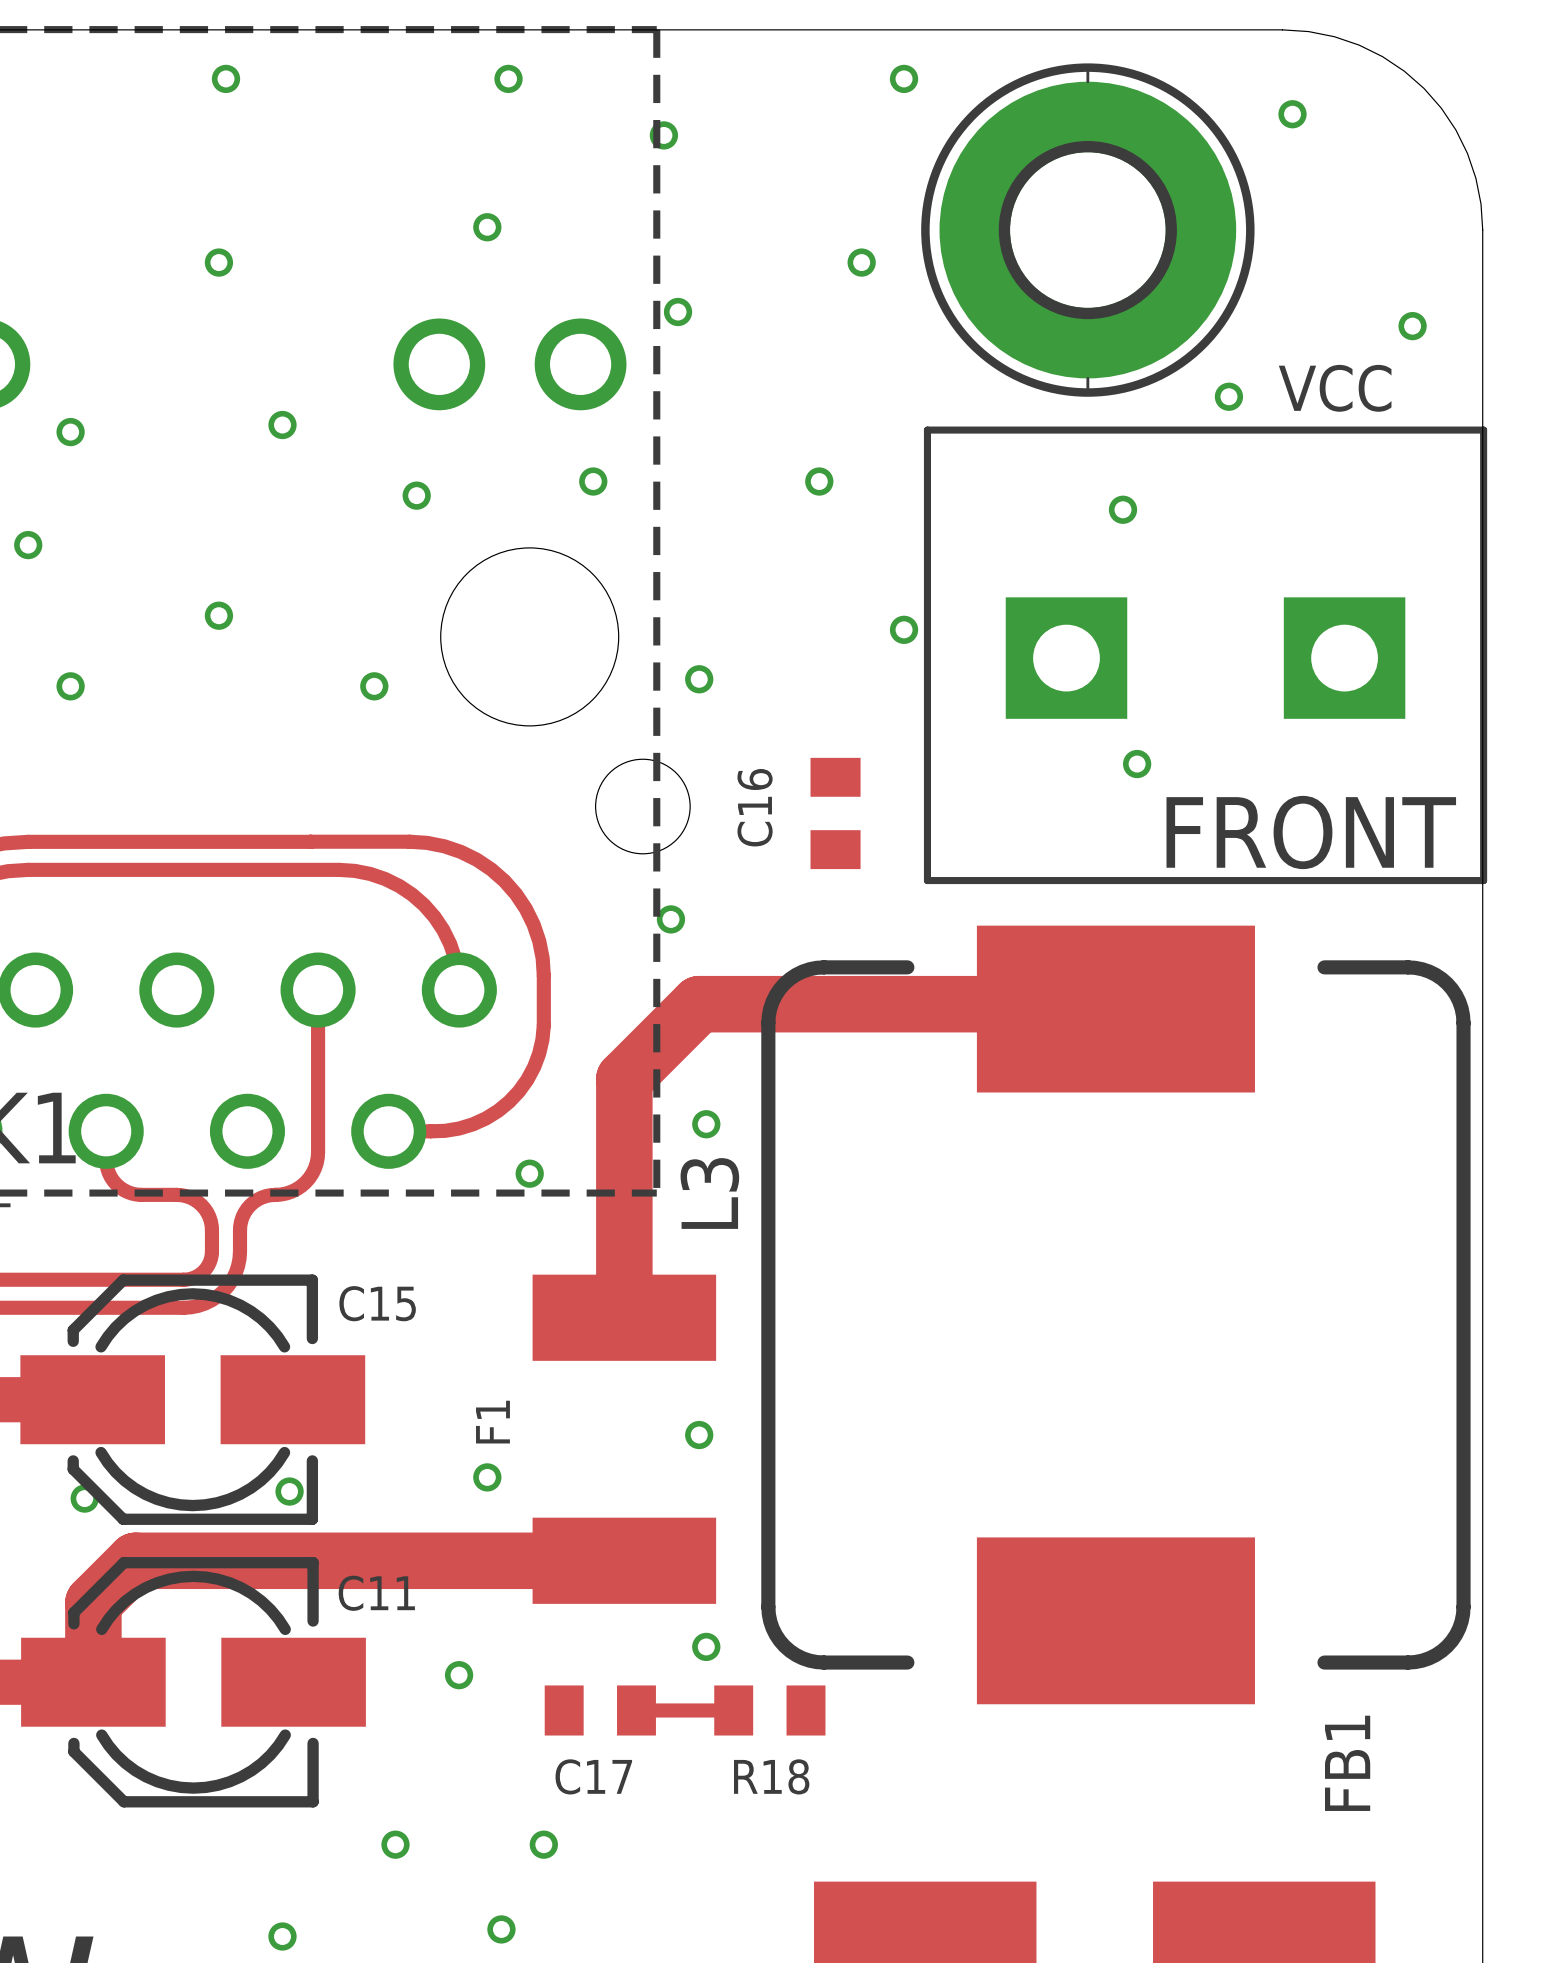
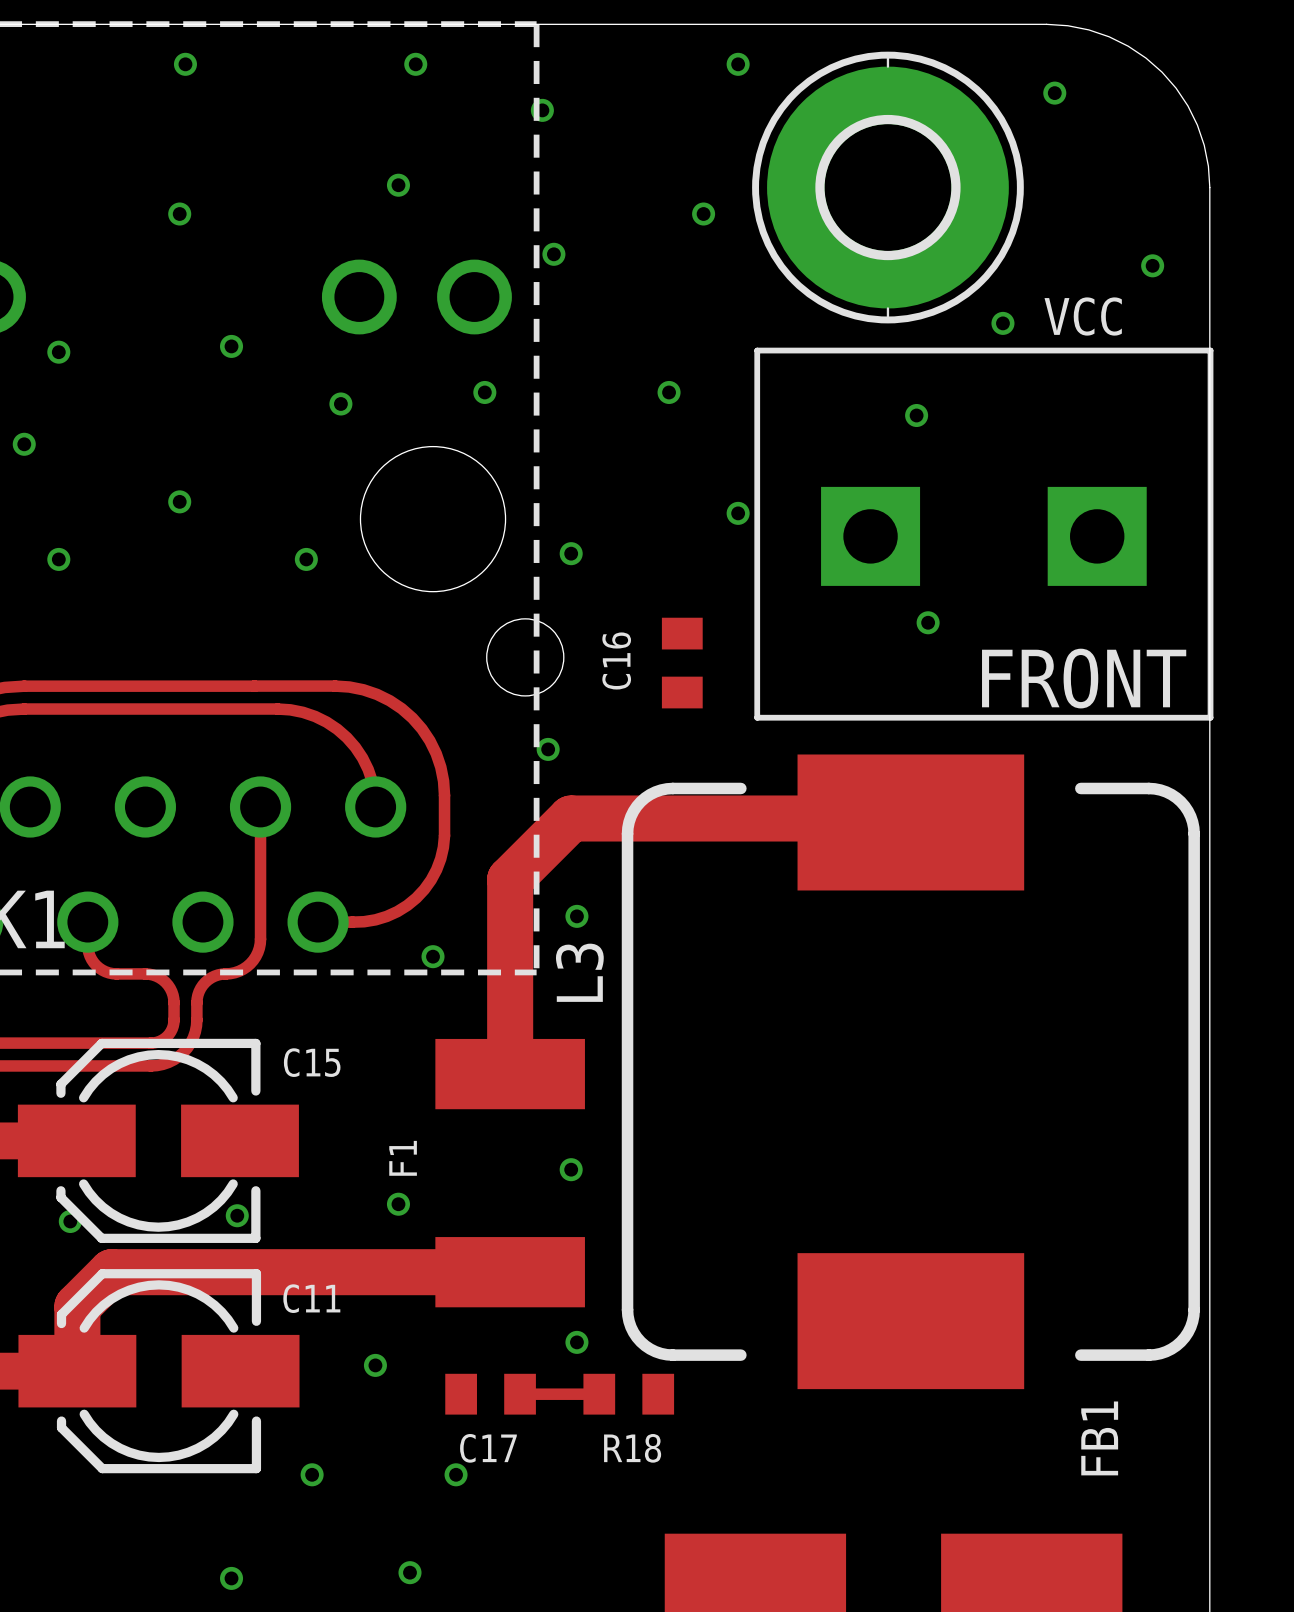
via position: (395, 1844) -> (312, 1474)
via position: (543, 1844) -> (456, 1474)

